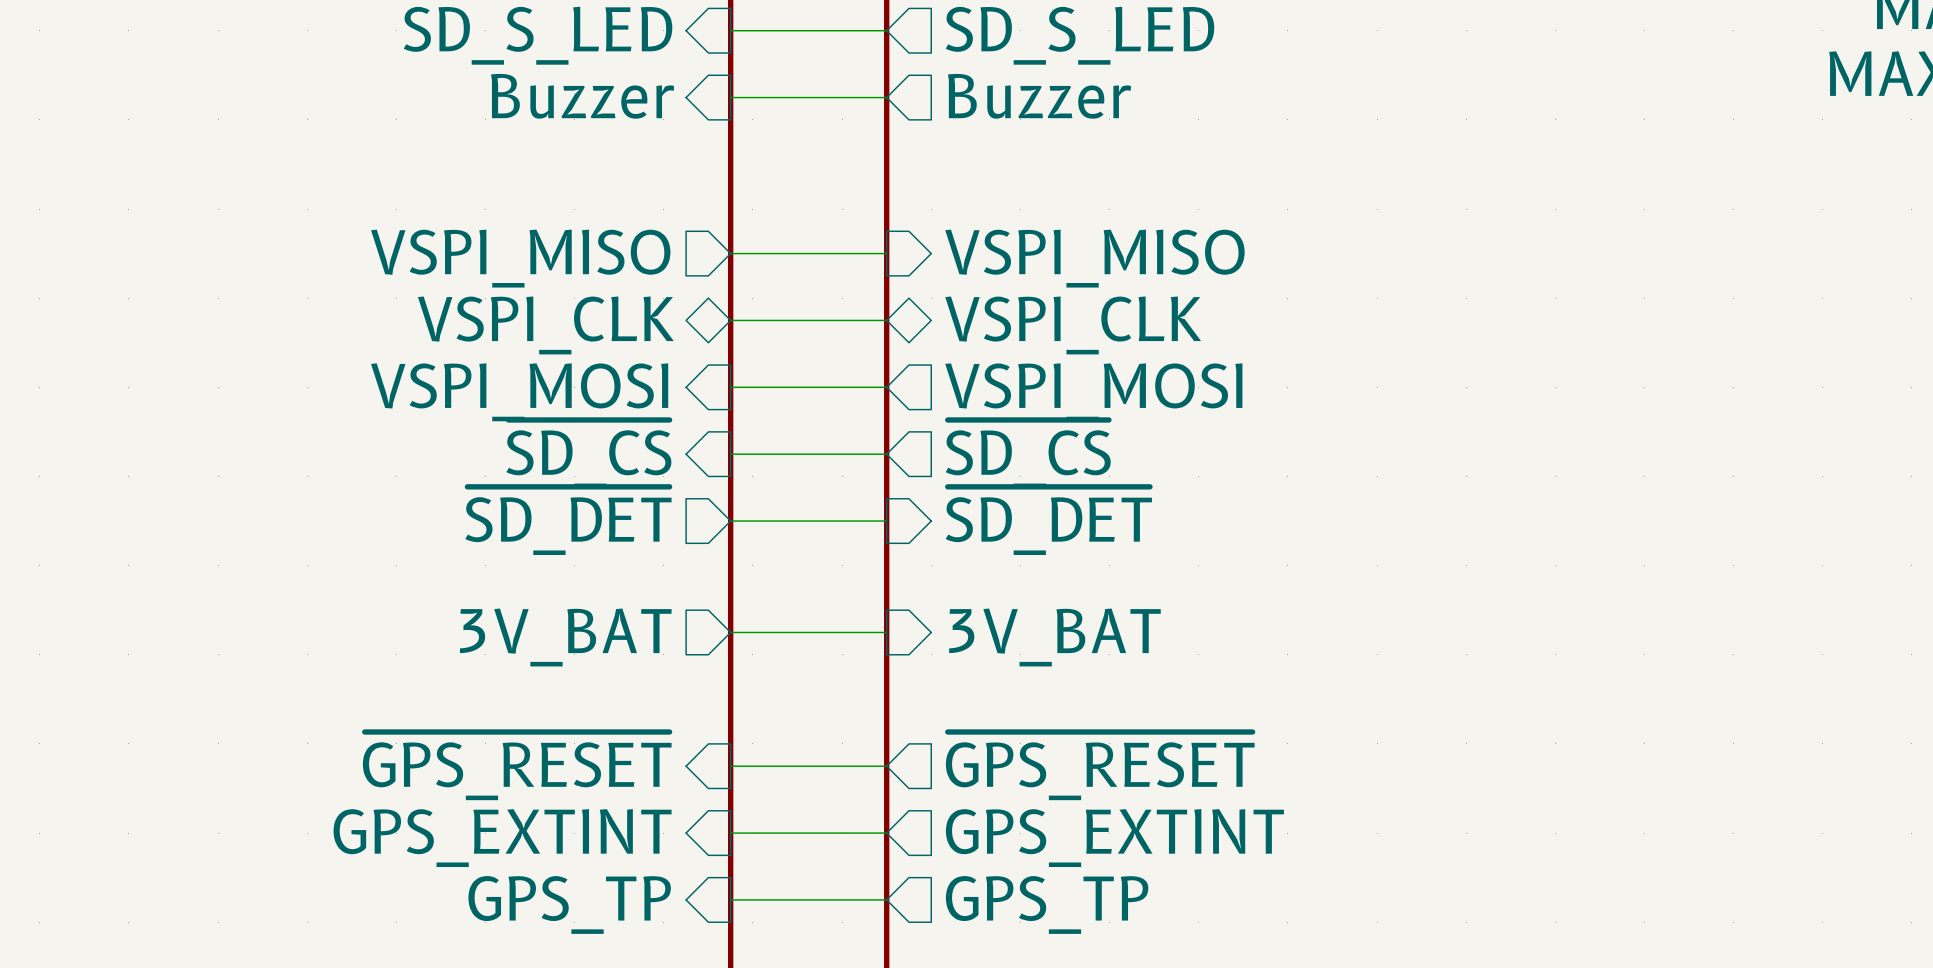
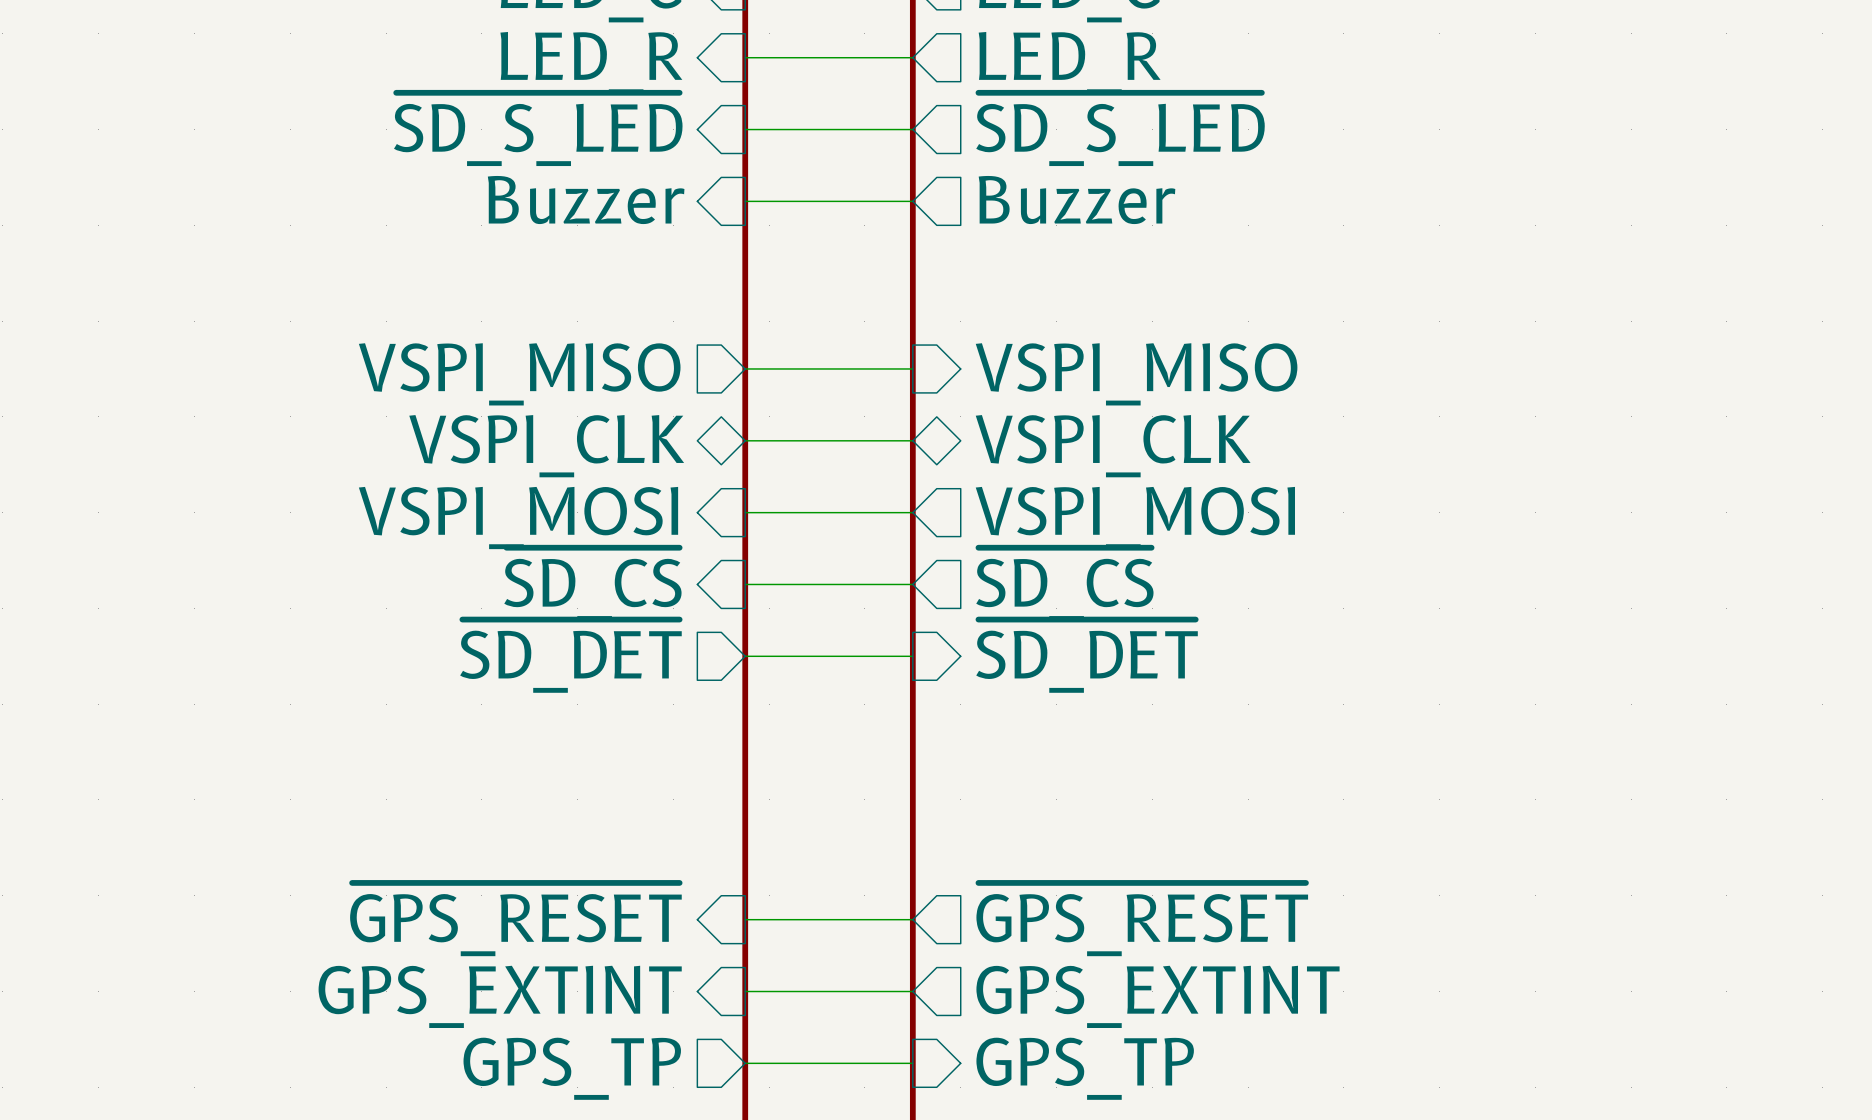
wire: (730, 632) (886, 632) -> none
sheet pin: 3V_BAT (565, 637) -> none
sheet pin: 3V_BAT (1054, 637) -> none
sheet pin shape: input (569, 904) -> output (572, 1068)
sheet pin shape: output (1047, 904) -> input (1085, 1068)

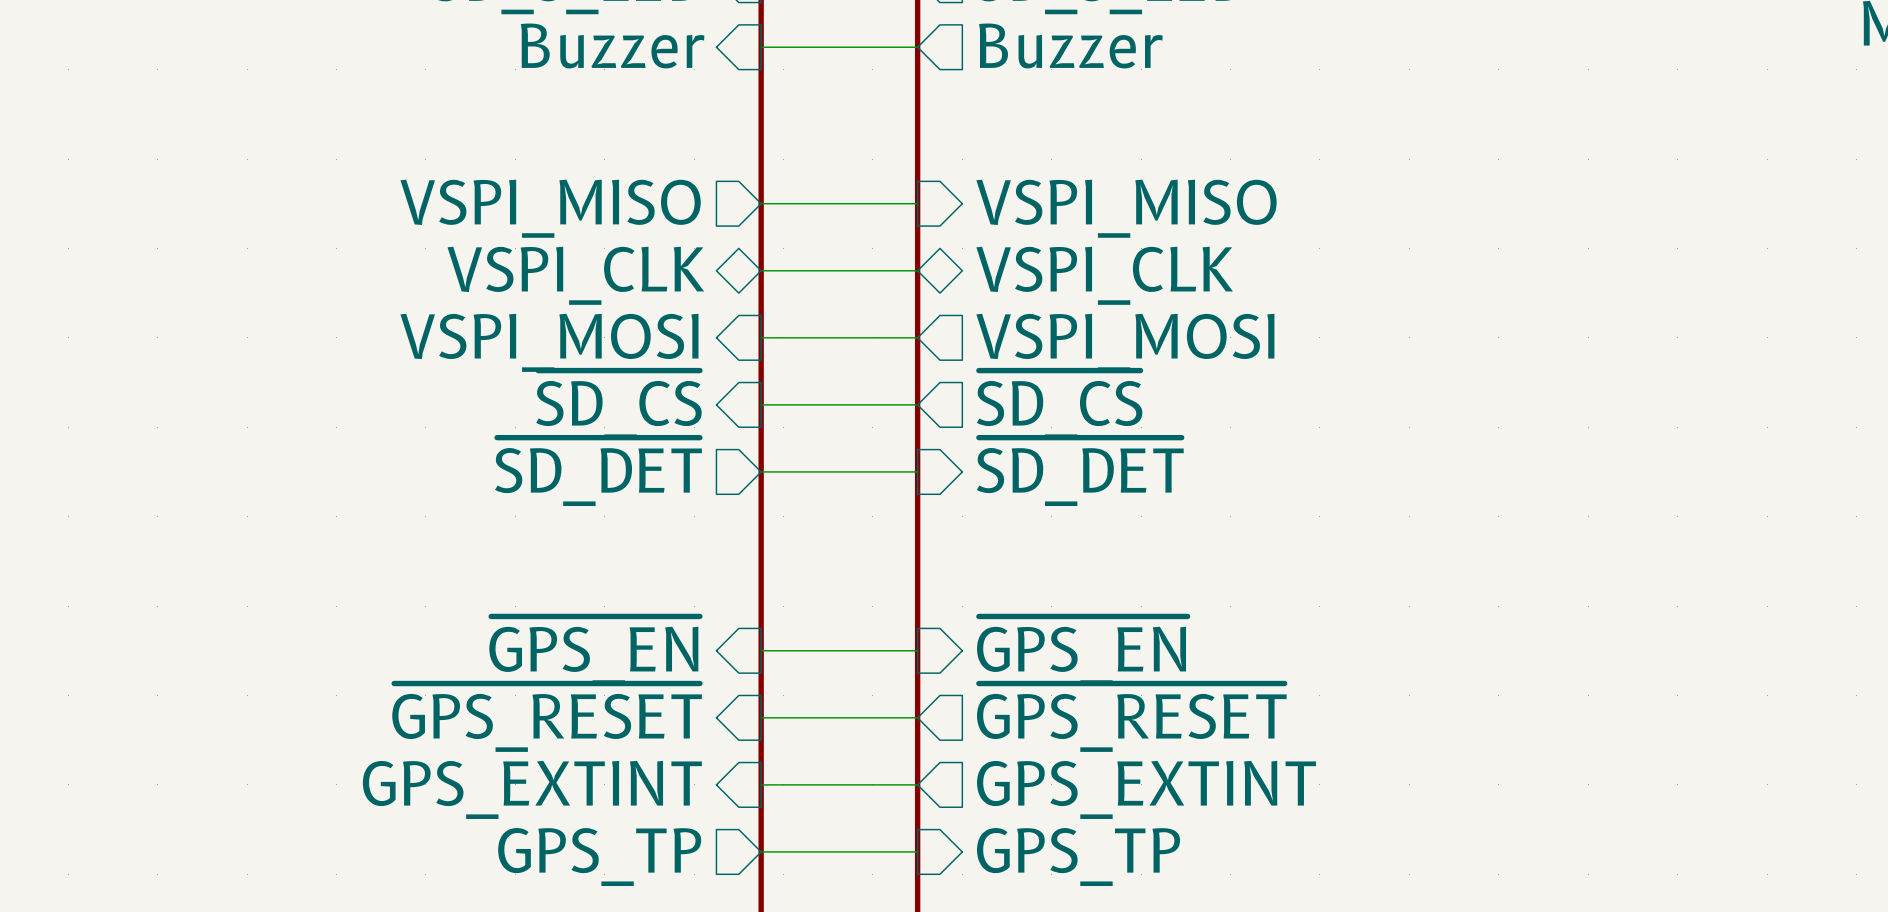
sheet pin: none -> ~{GPS_EN} (594, 650)
wire: none -> (761, 650) (917, 650)
sheet pin: none -> ~{GPS_EN} (1082, 650)

